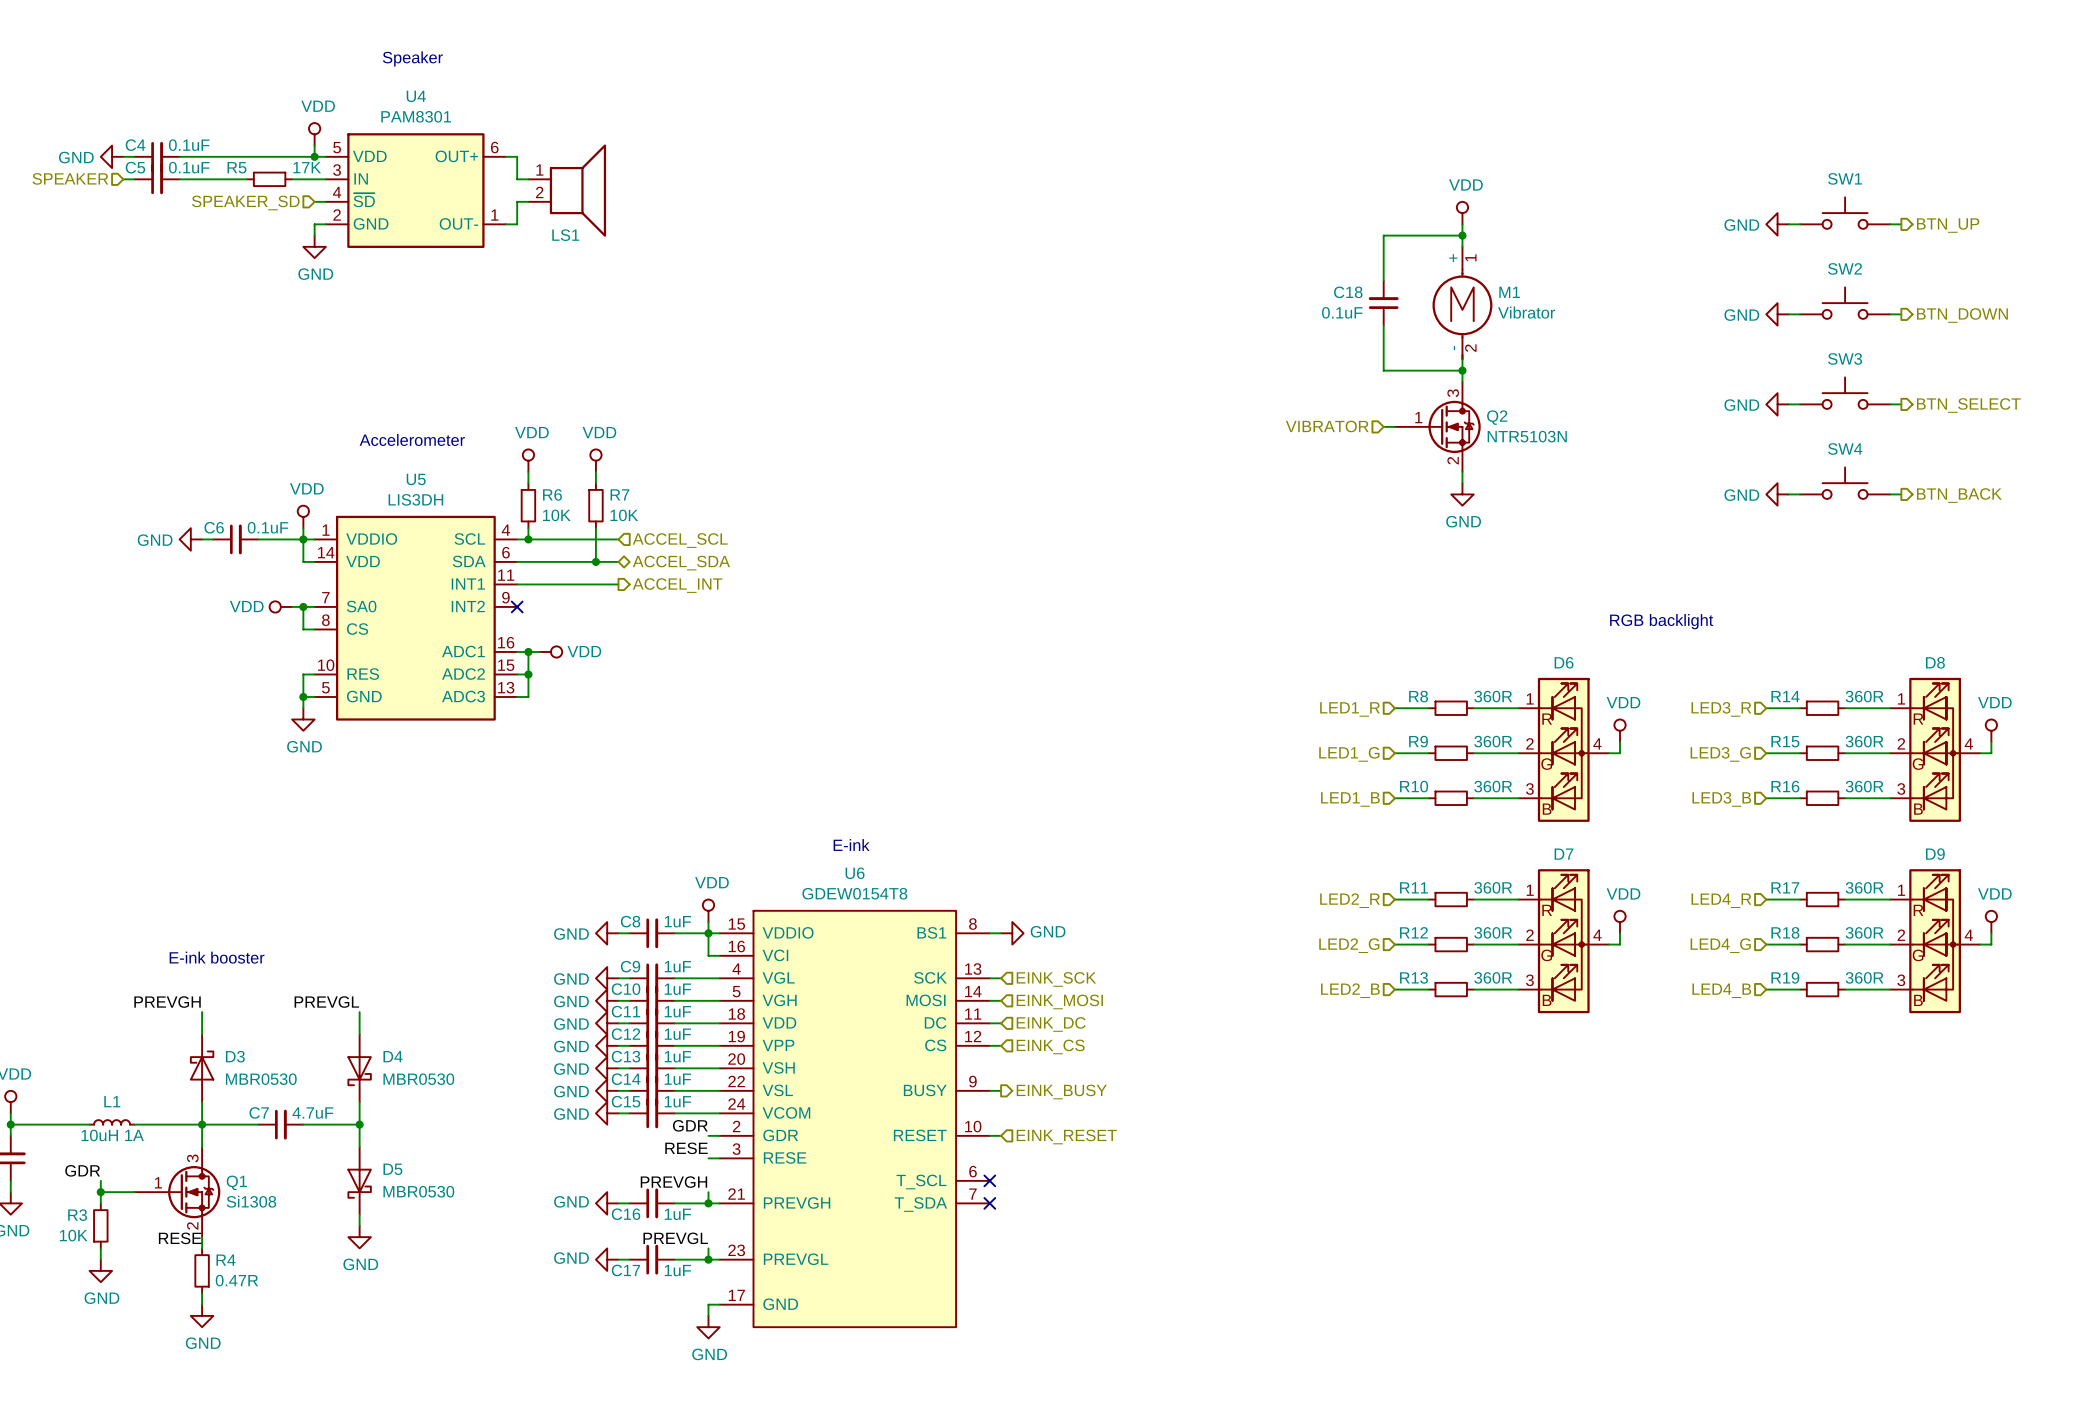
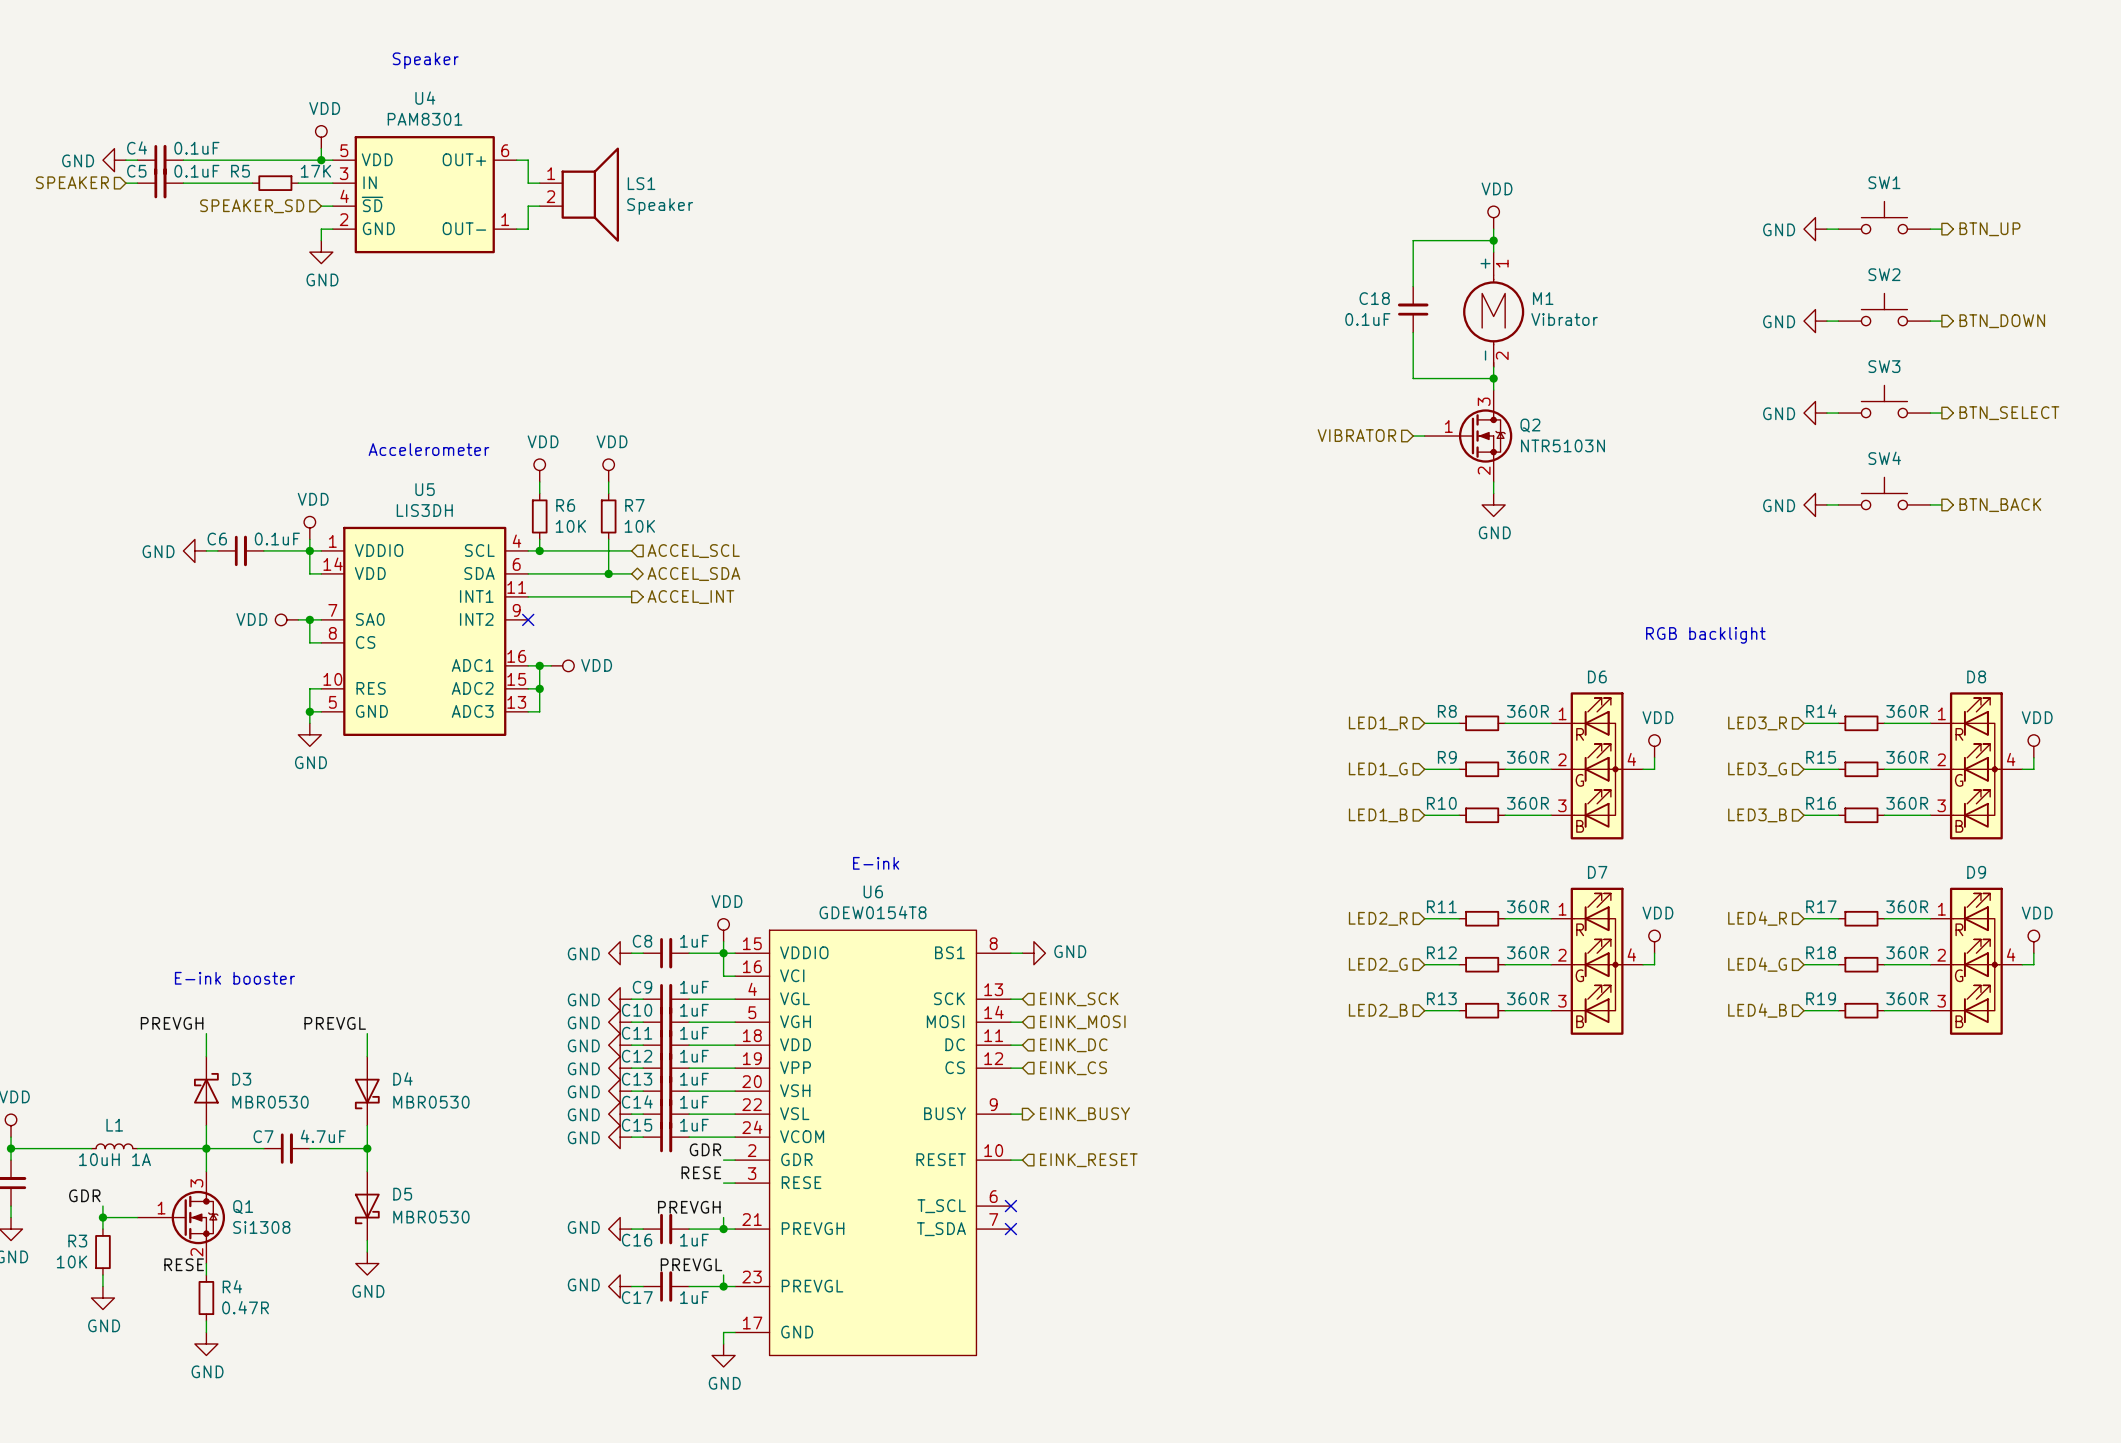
LS1 value: none -> Speaker (660, 206)
LS1 name position: LS1 (565, 235) -> LS1 (641, 183)

